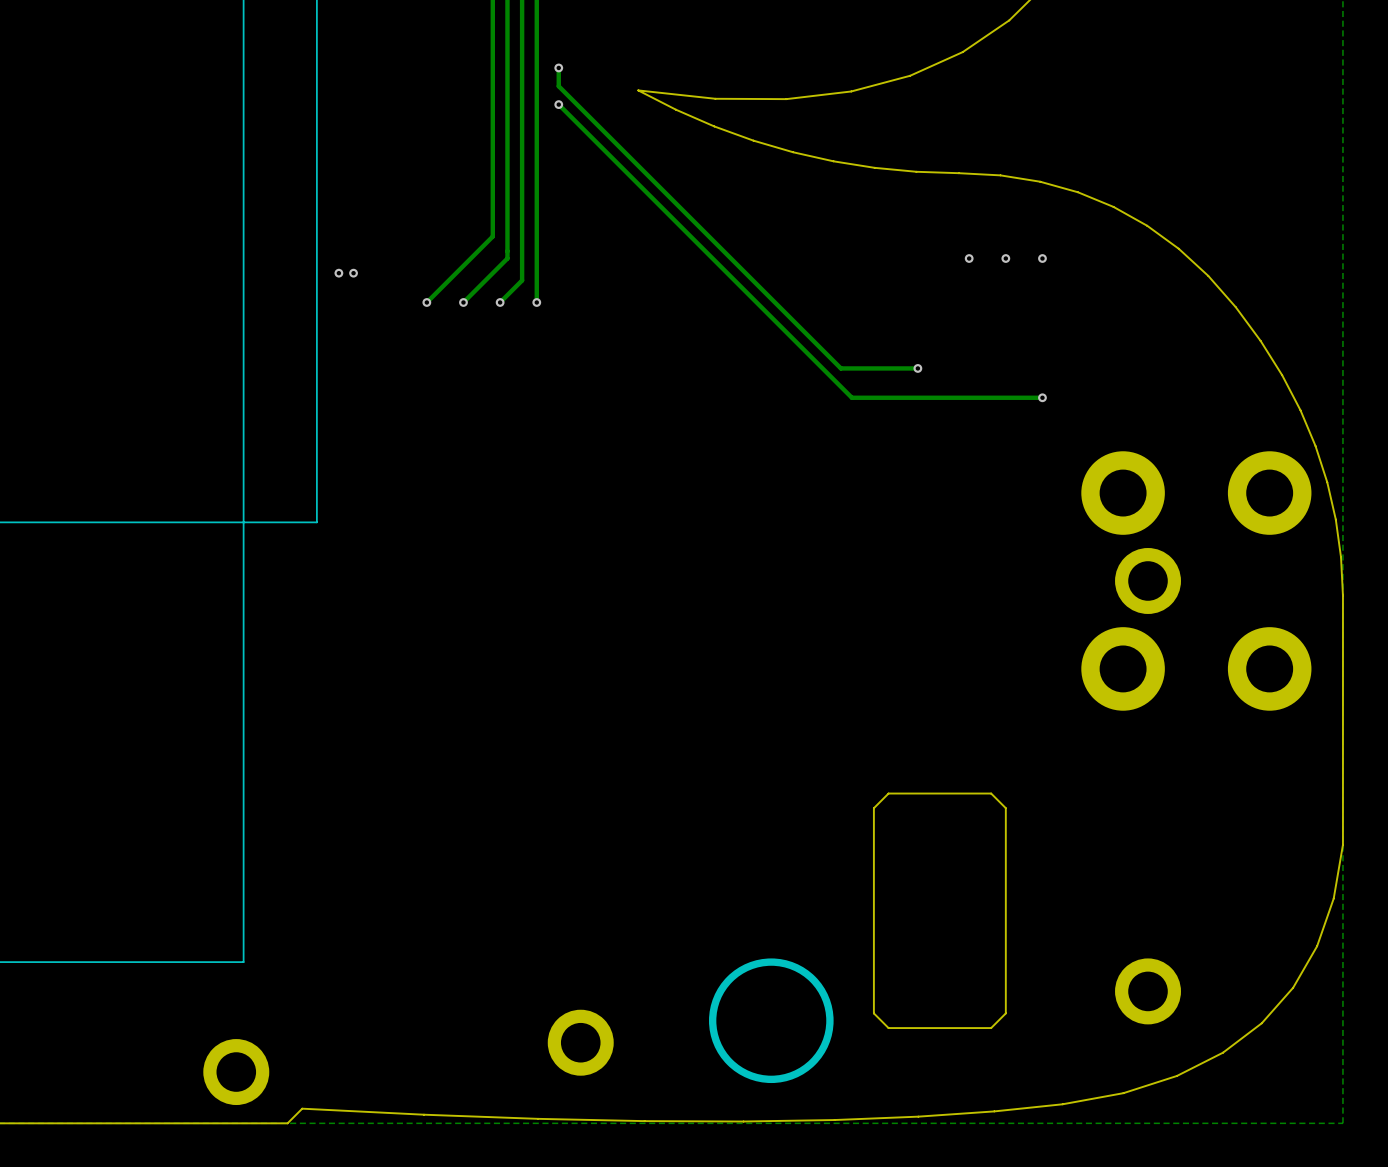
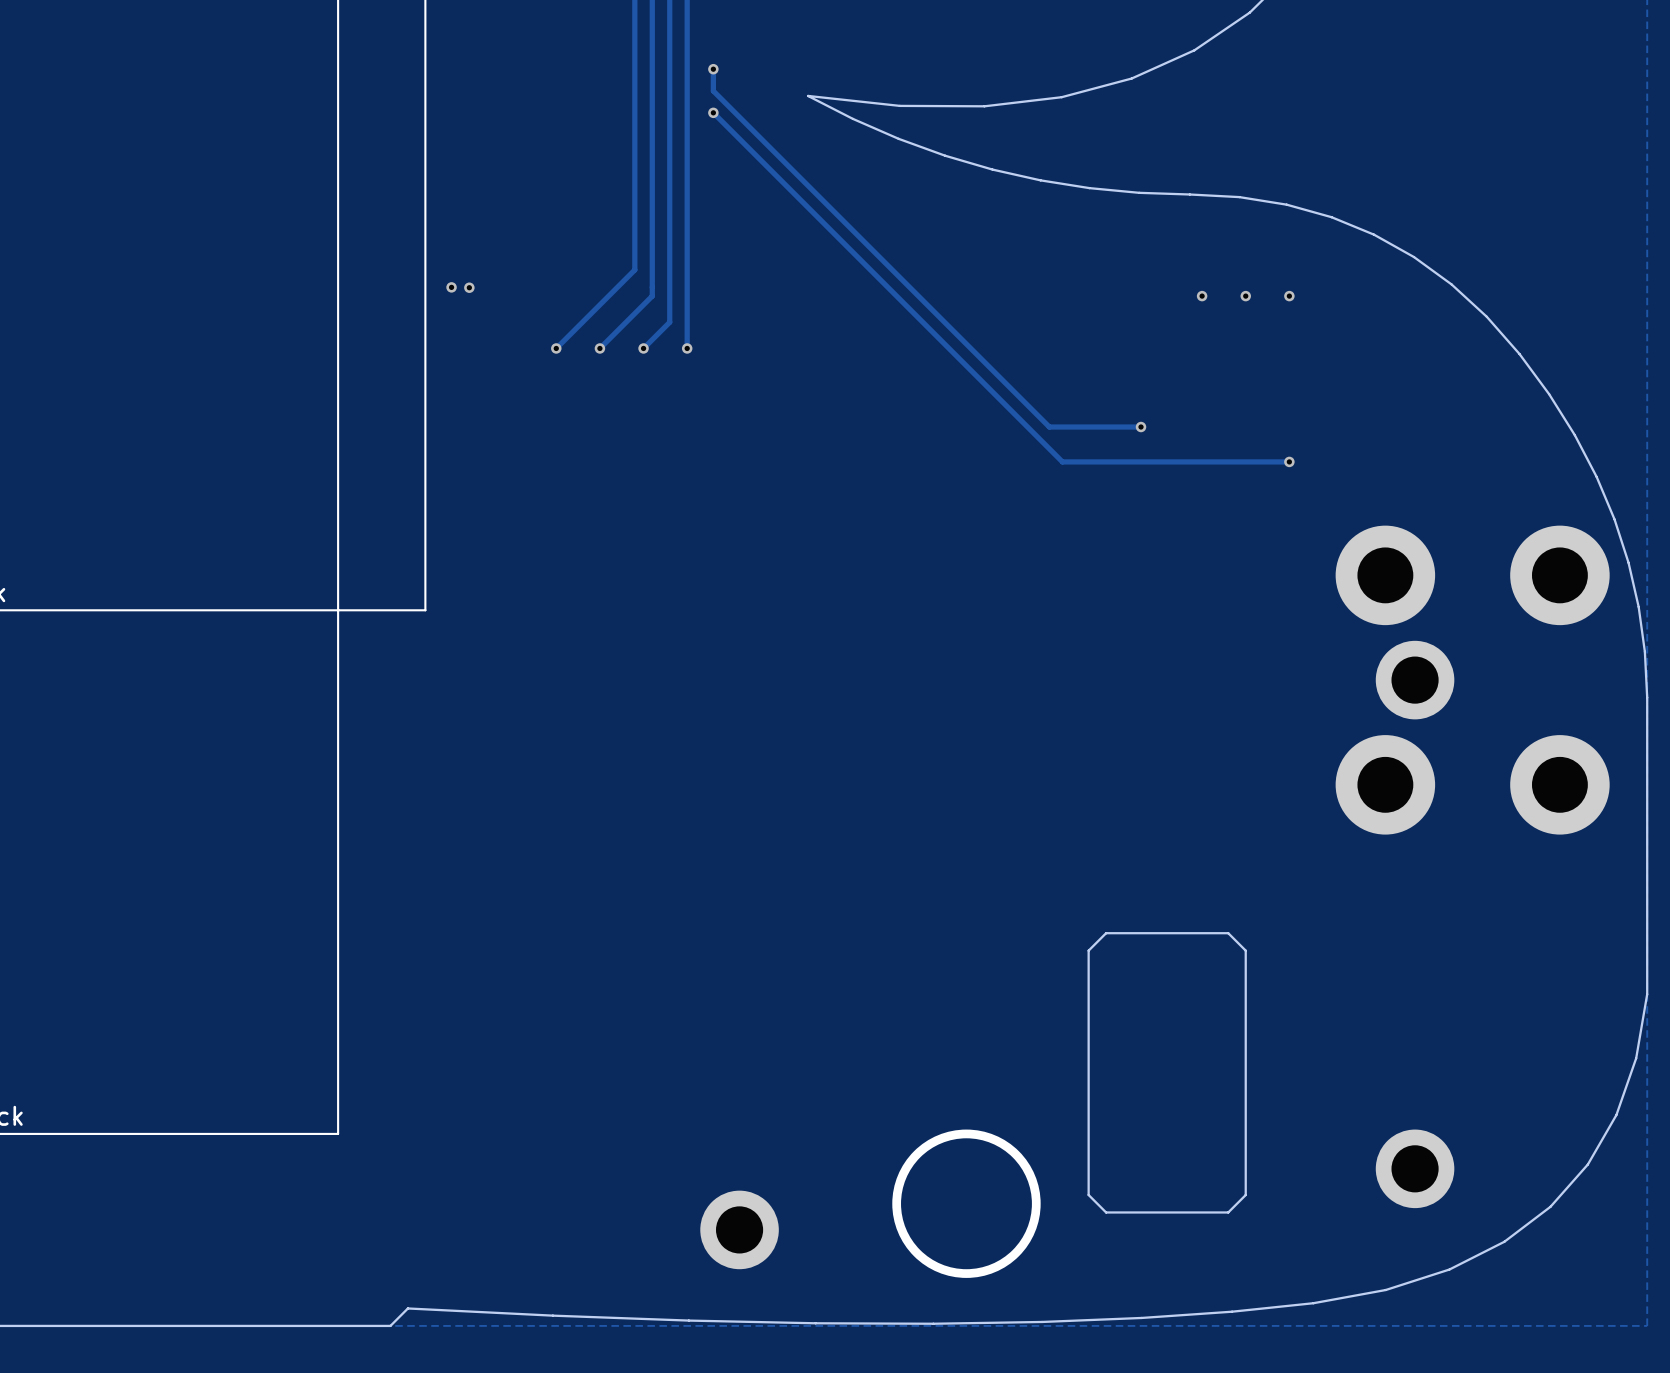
via: none -> (451, 287)
via: none -> (469, 287)
via: (338, 273) -> none
via: (353, 273) -> none
part: (236, 1072) -> none

